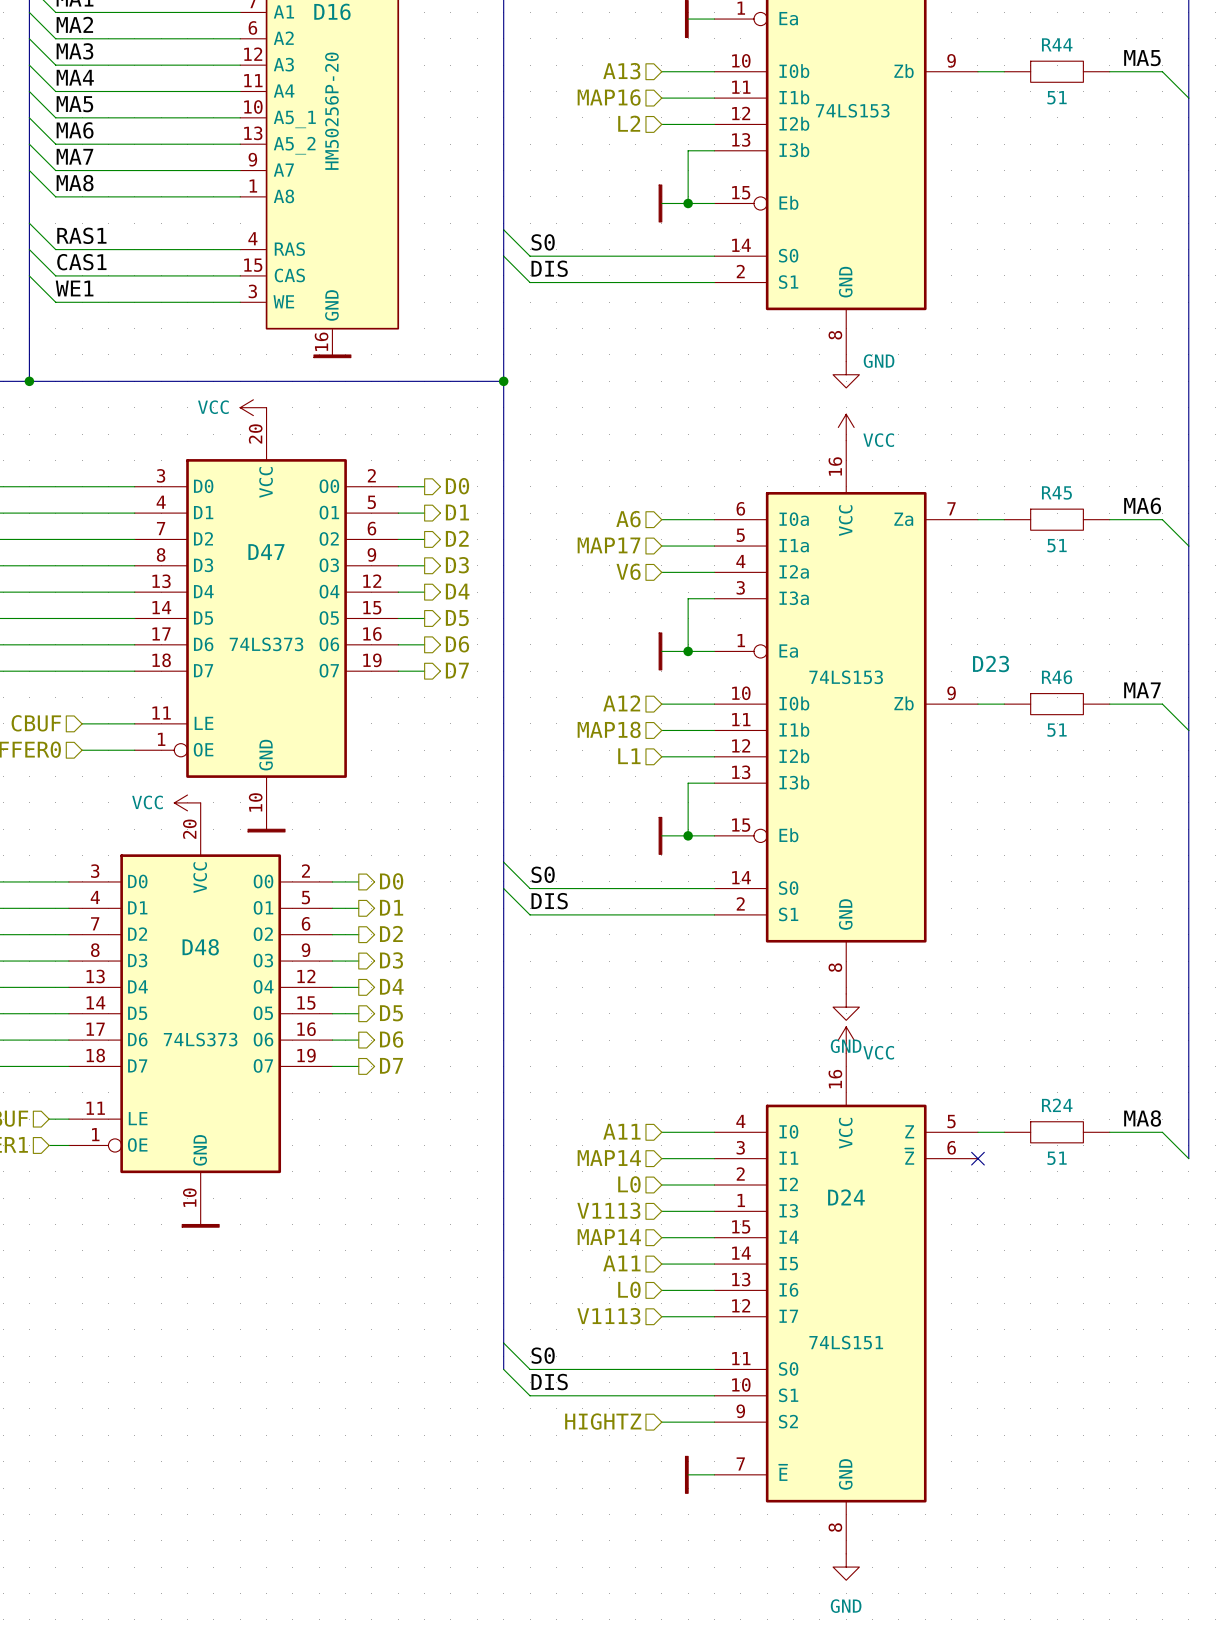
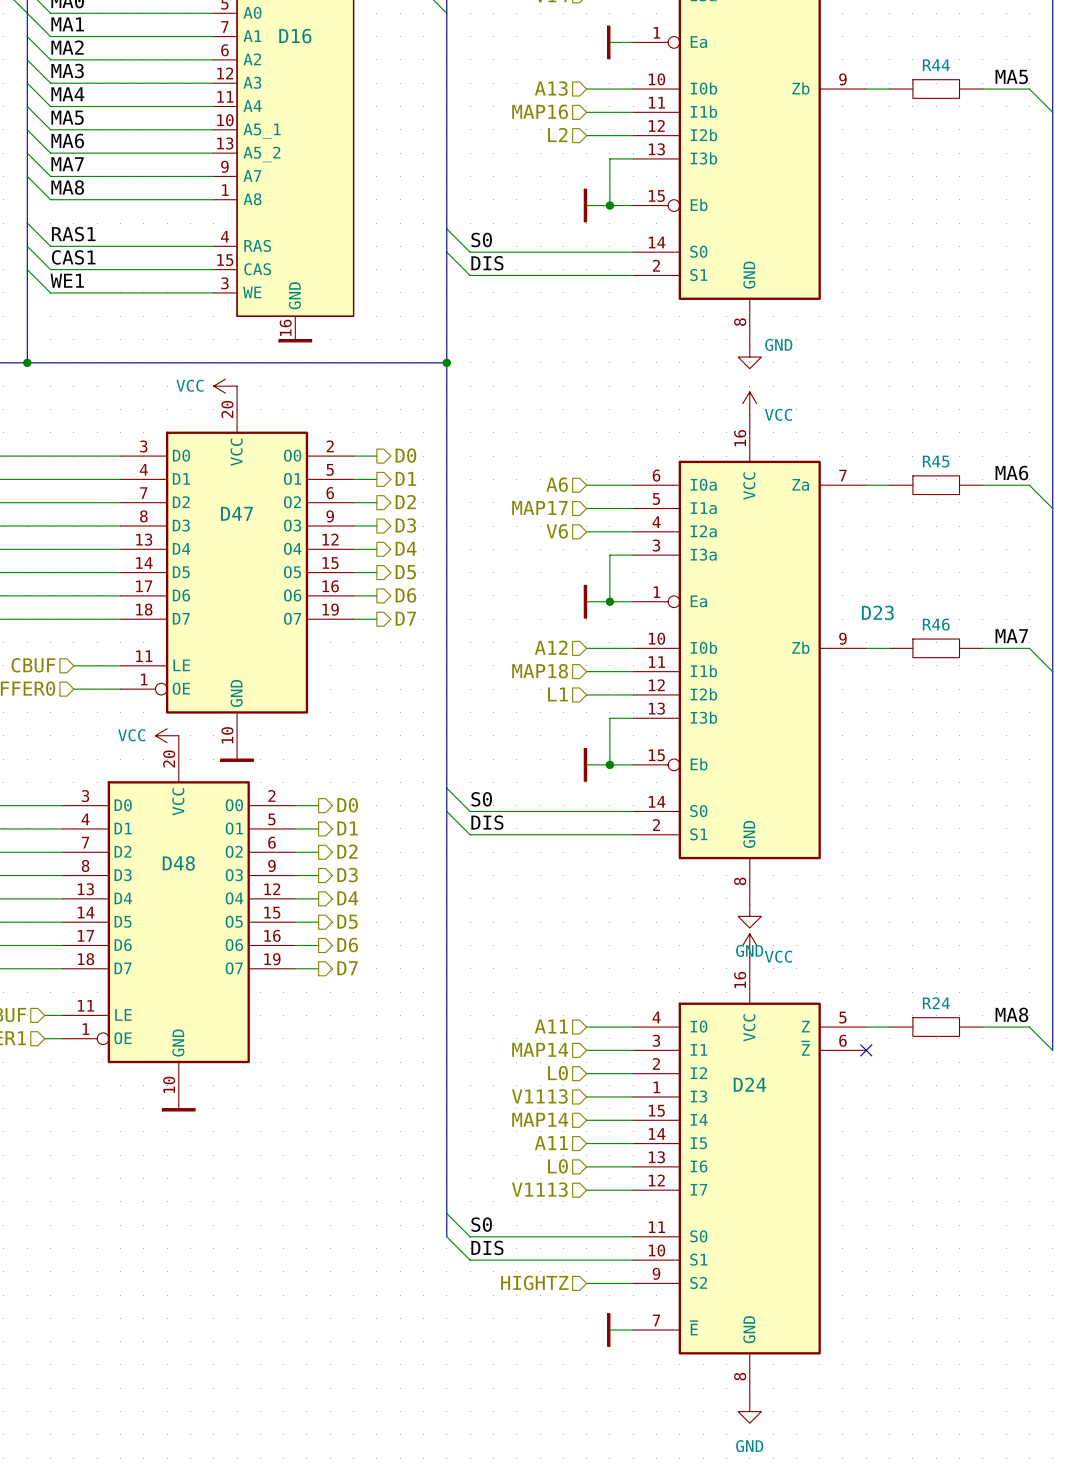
R44 value: 51 (1057, 97) -> none
part value: 74LS153 (852, 110) -> none
D16 value: HM50256P-20 (331, 111) -> none
R45 value: 51 (1057, 545) -> none
D47 value: 74LS373 (266, 644) -> none
D23 value: 74LS153 (846, 677) -> none
R46 value: 51 (1057, 730) -> none
D48 value: 74LS373 (200, 1039) -> none
R24 value: 51 (1057, 1158) -> none
D24 value: 74LS151 (846, 1342) -> none

